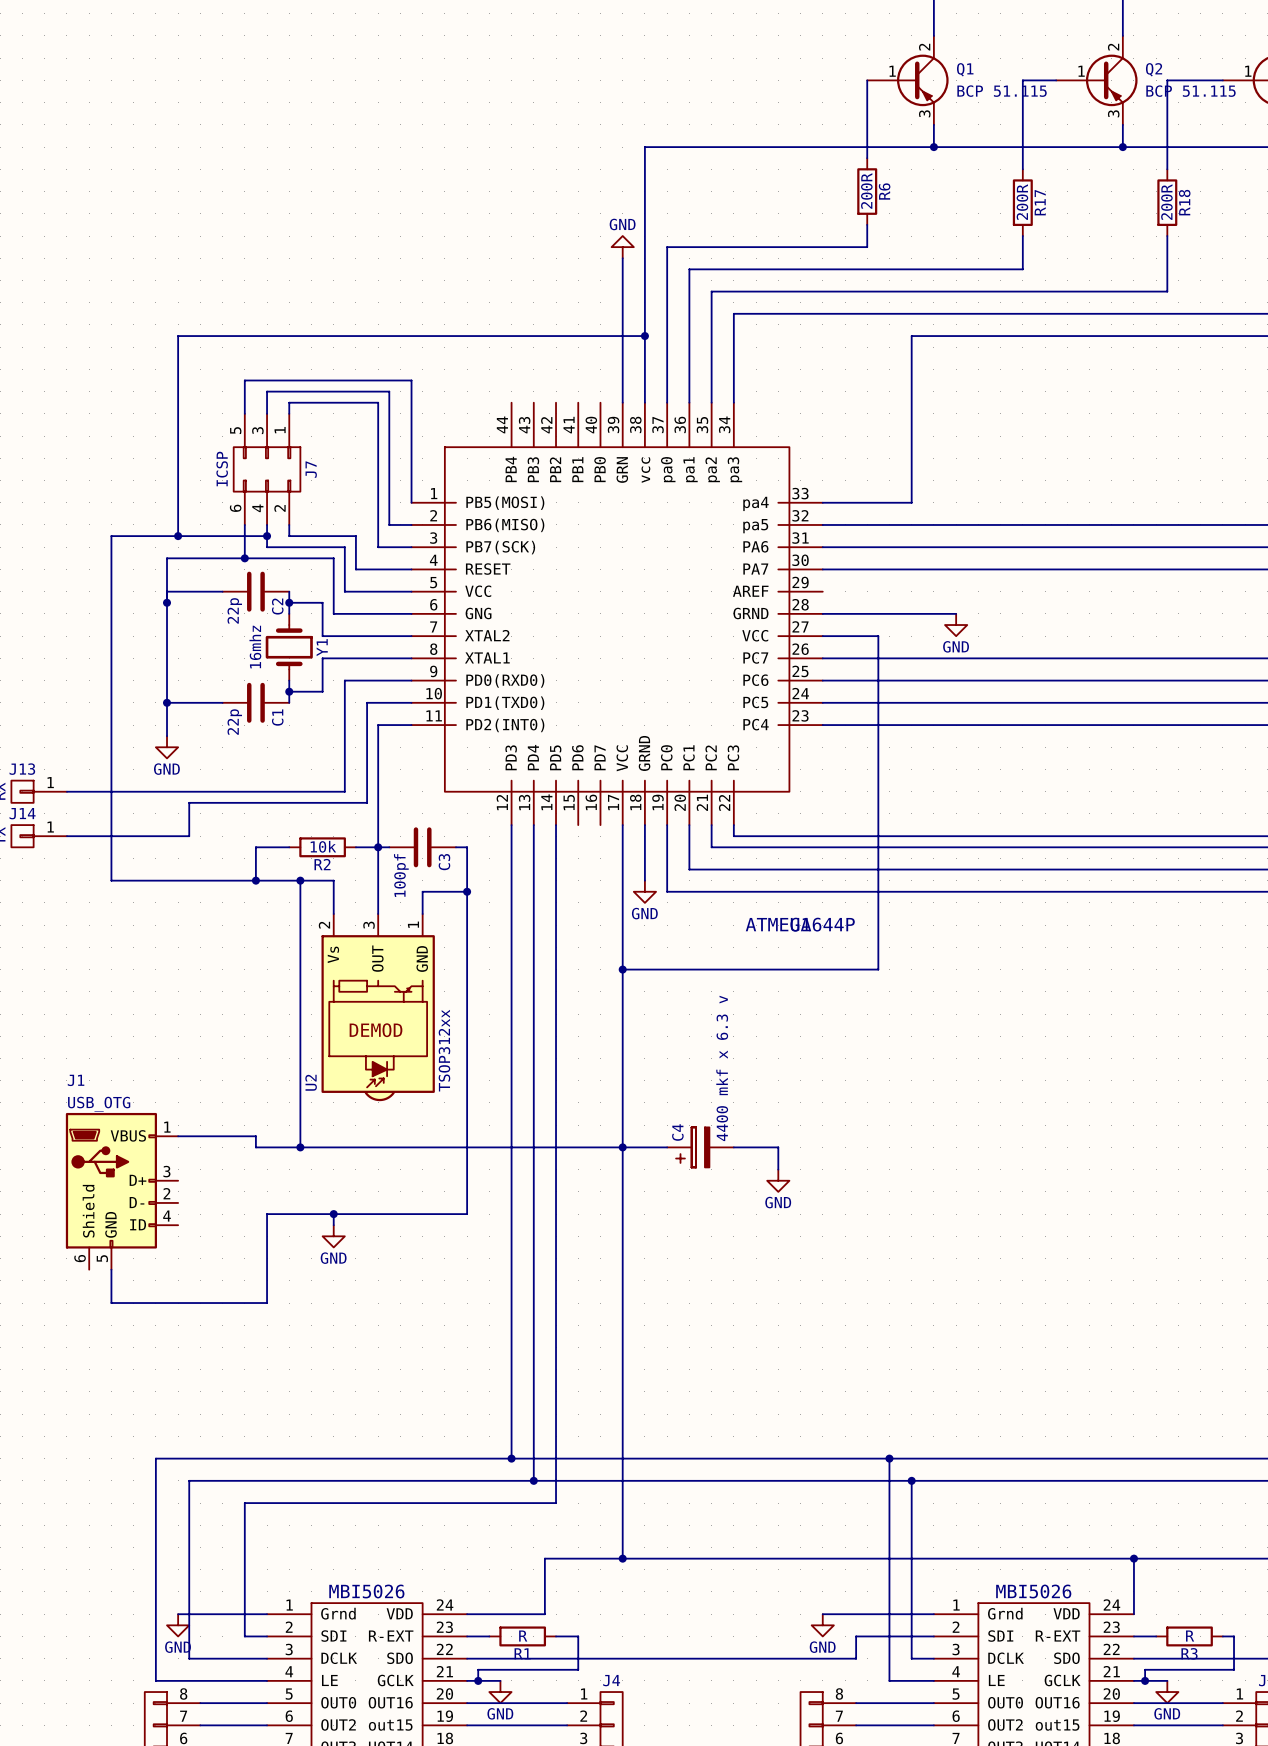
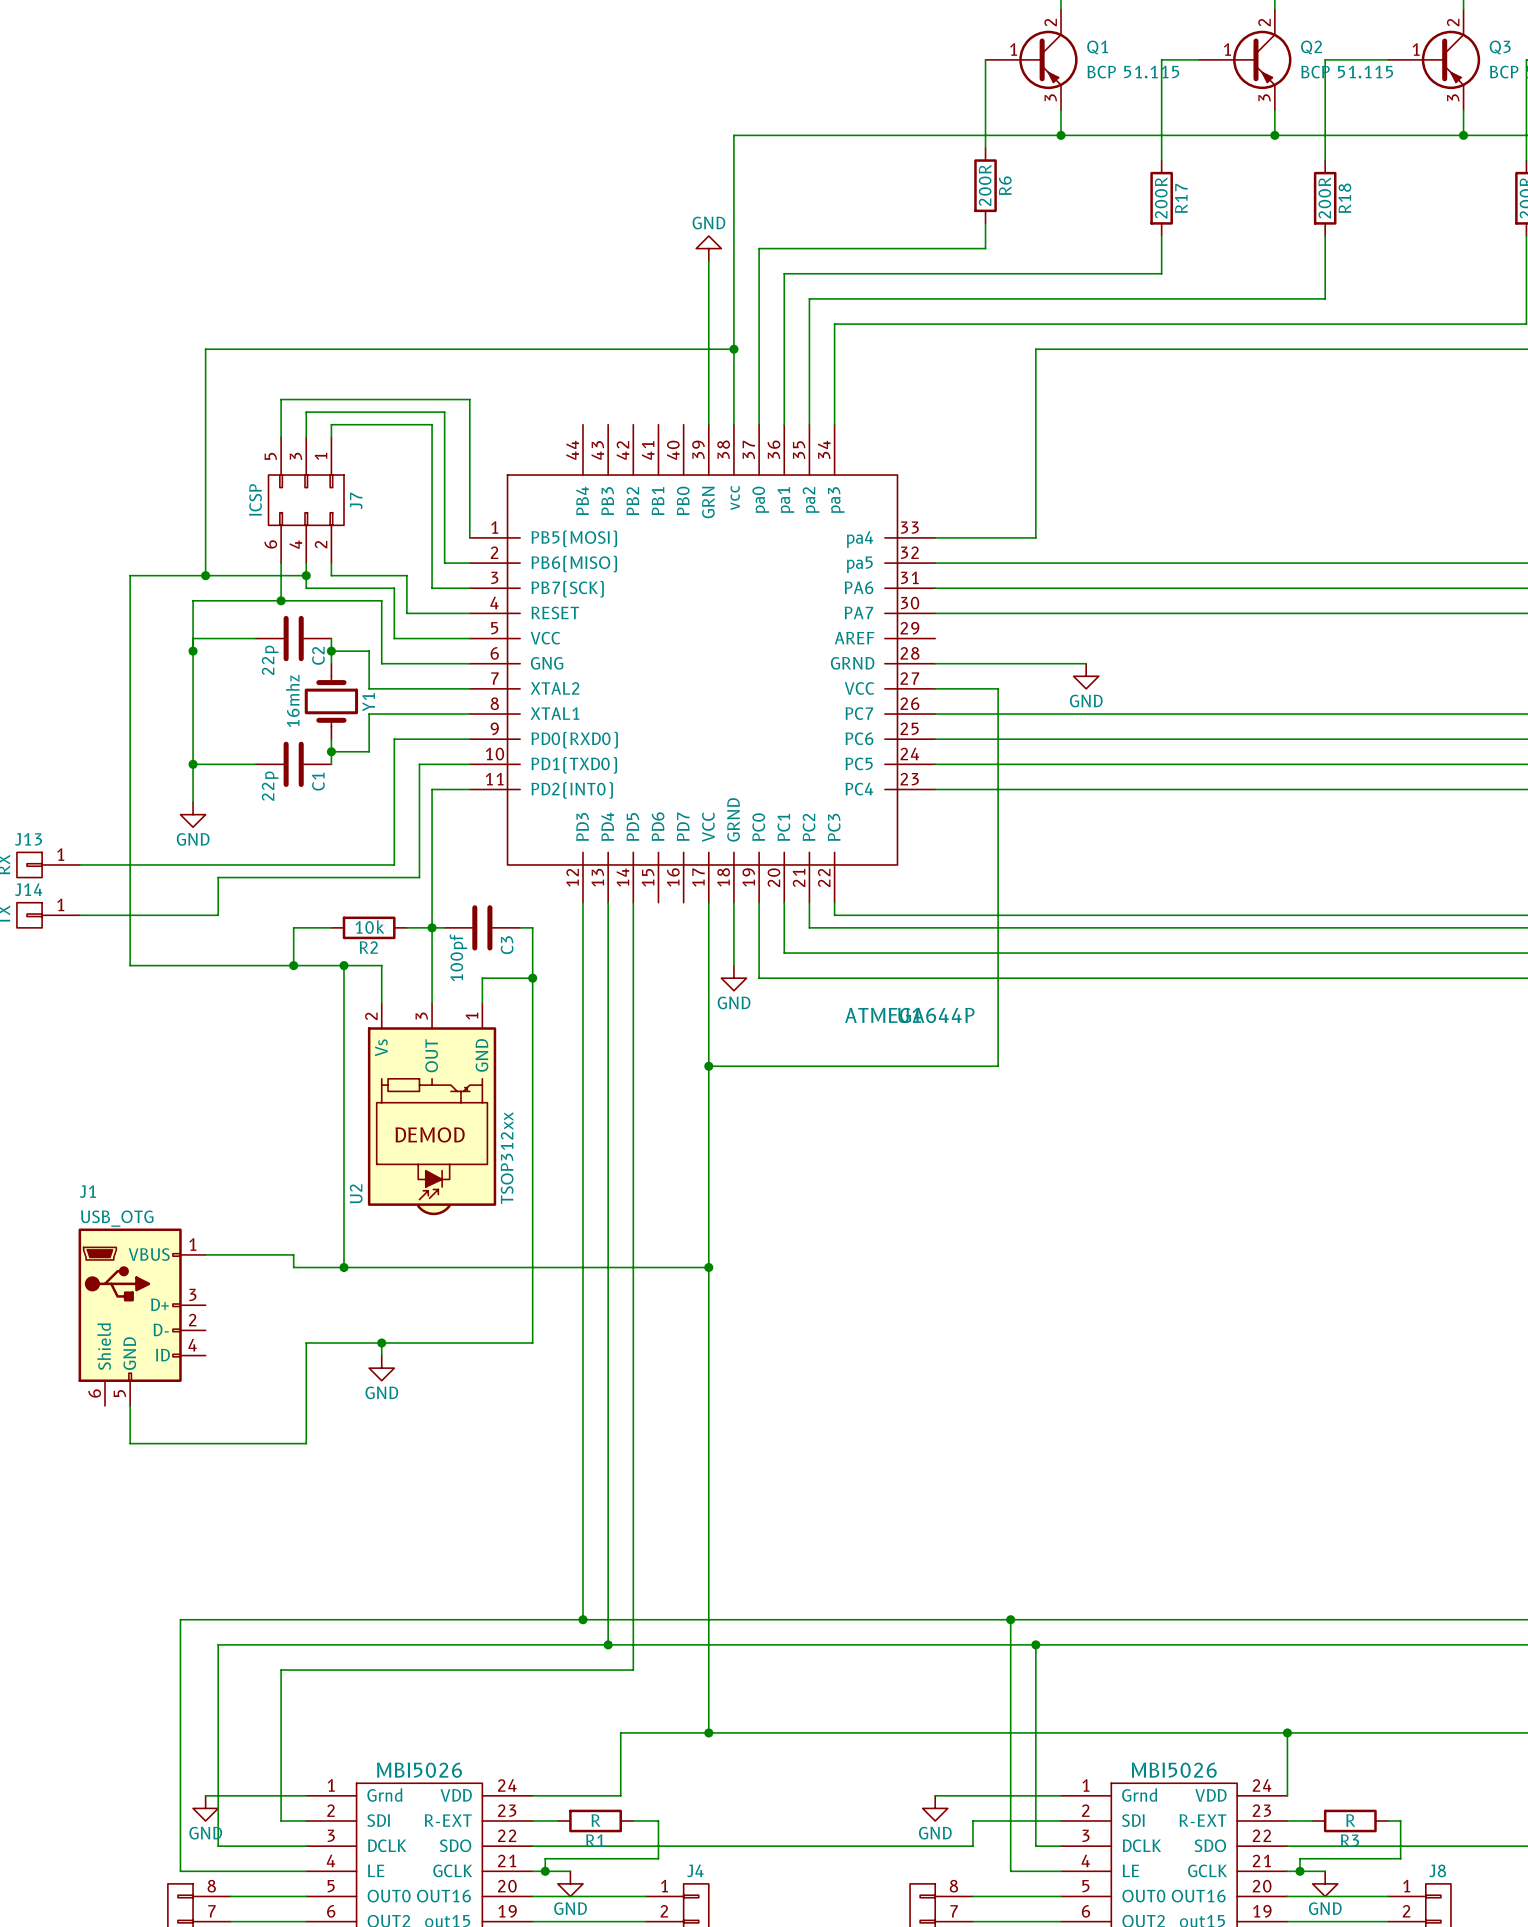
wire: (622, 1147) (667, 1147) -> none
C4: 4400 mkf x 6.3 v (700, 1147) -> none
wire: (733, 1147) (778, 1147) (778, 1169) -> none
power symbol: GND (778, 1180) -> none

